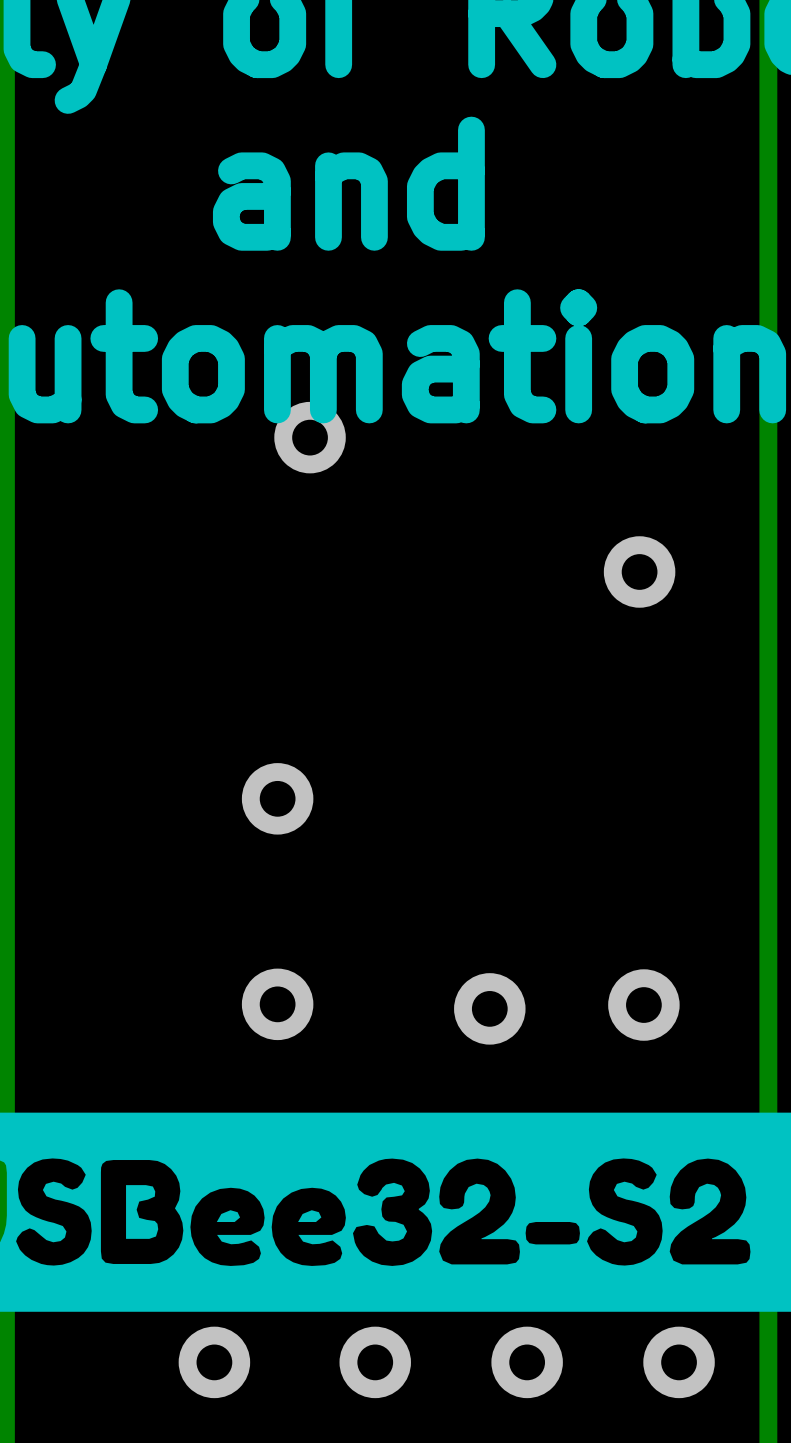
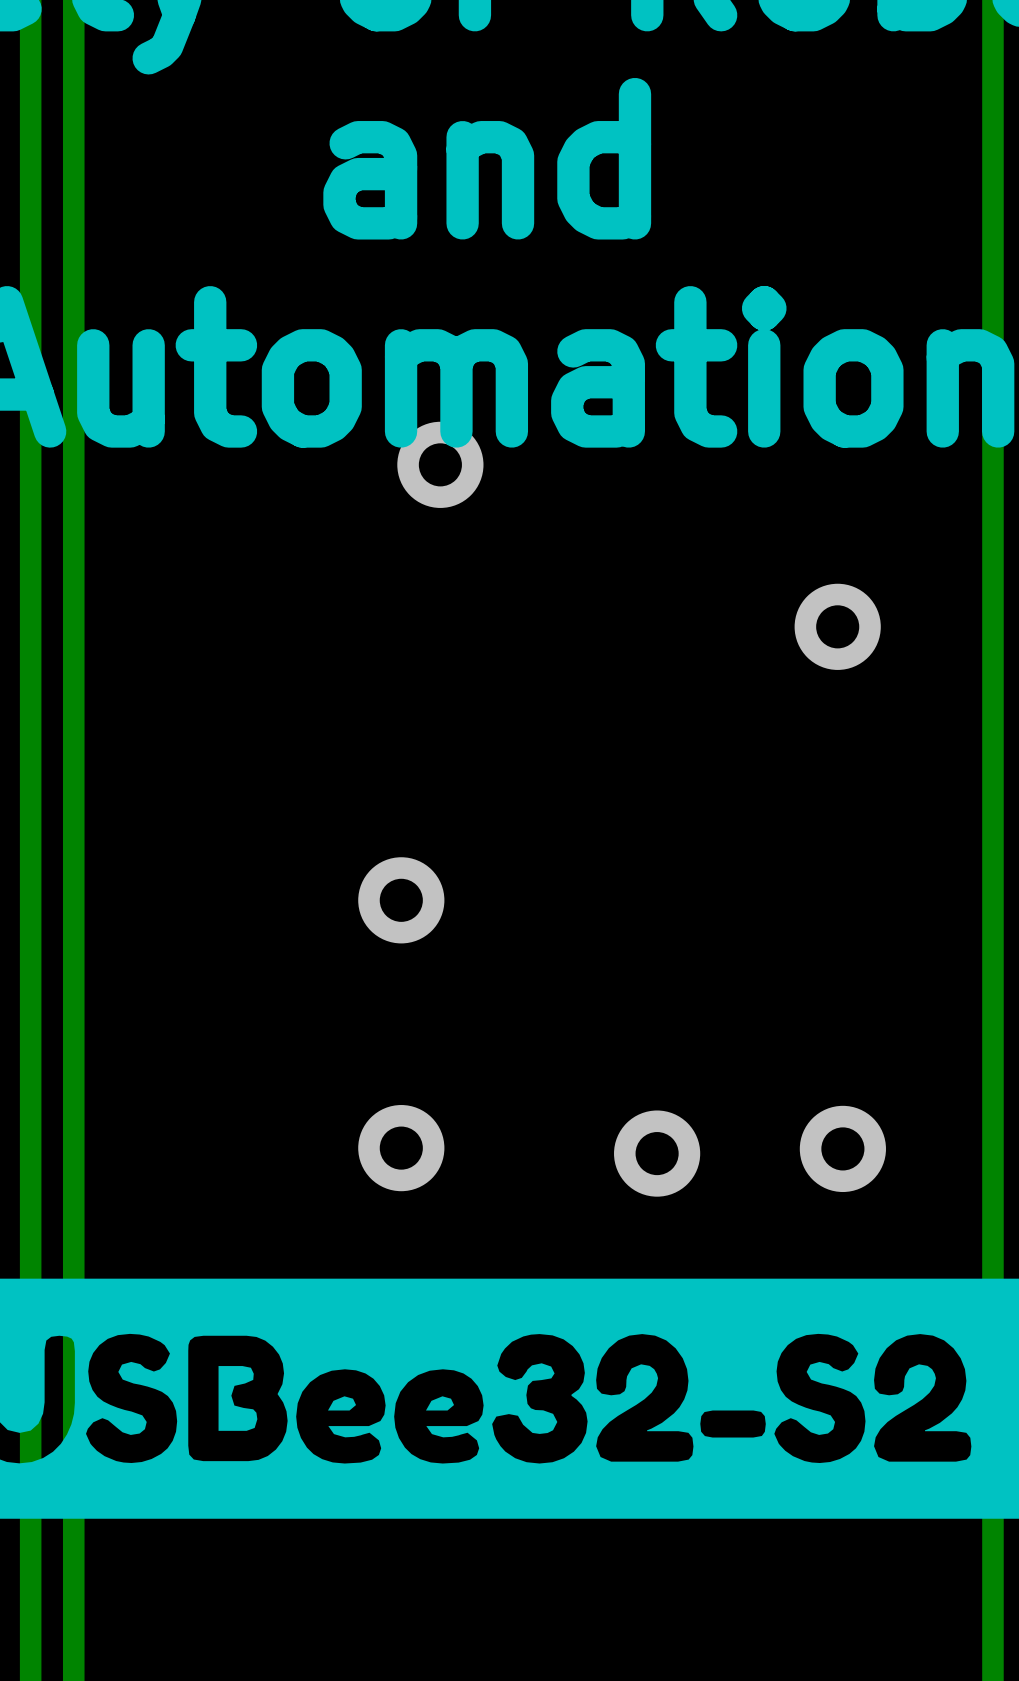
via: (214, 1362) -> none
via: (375, 1362) -> none
via: (527, 1362) -> none
via: (679, 1362) -> none

